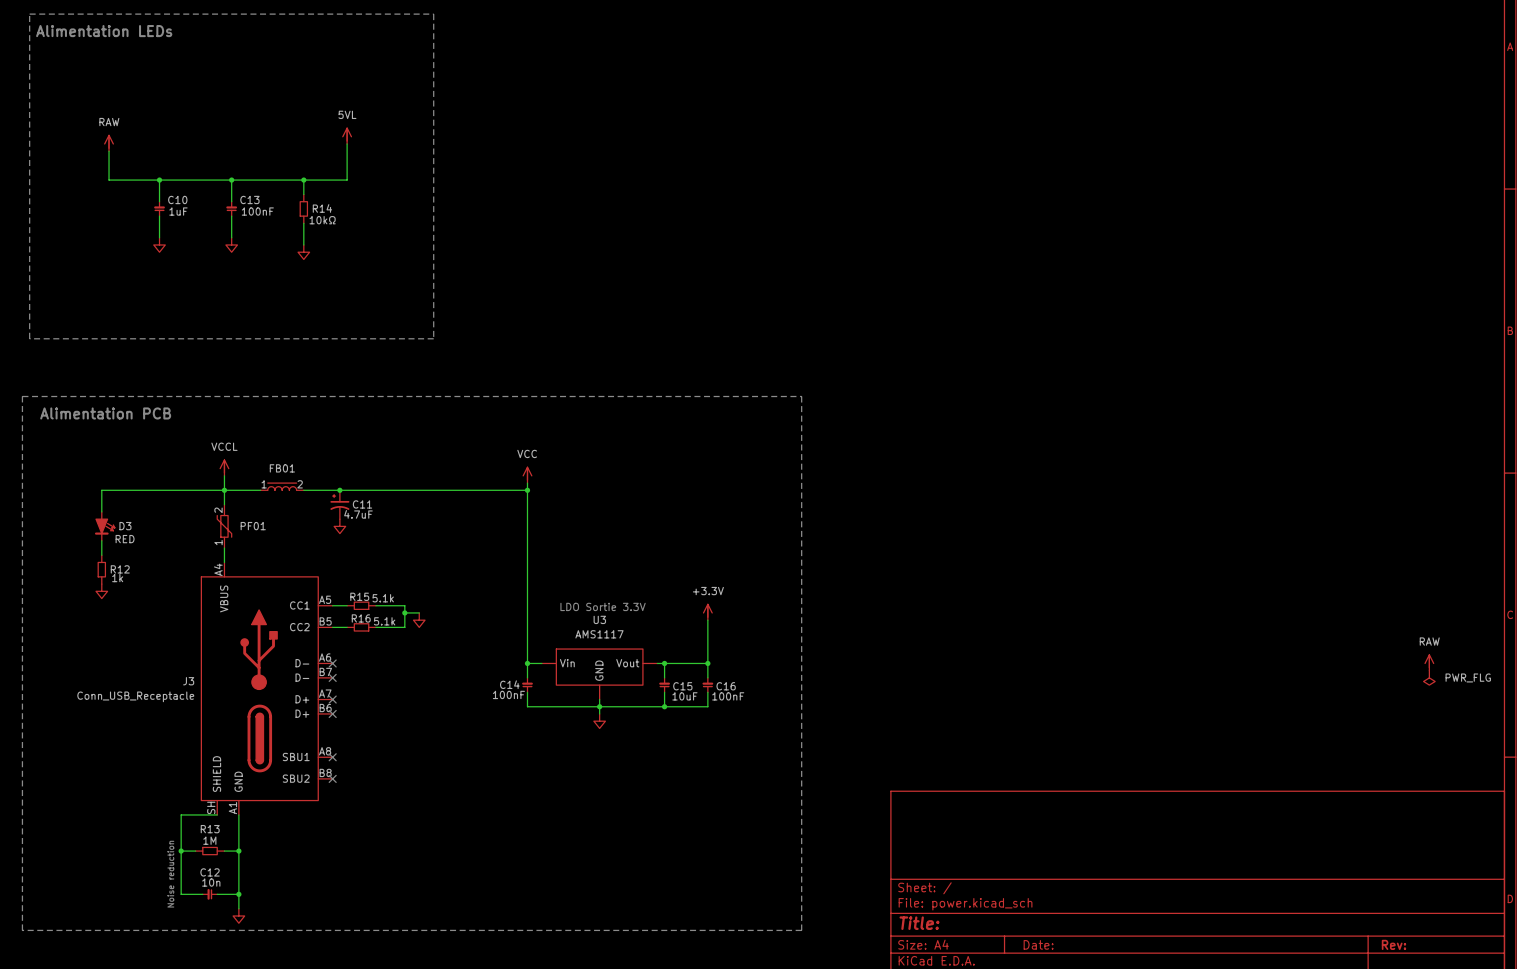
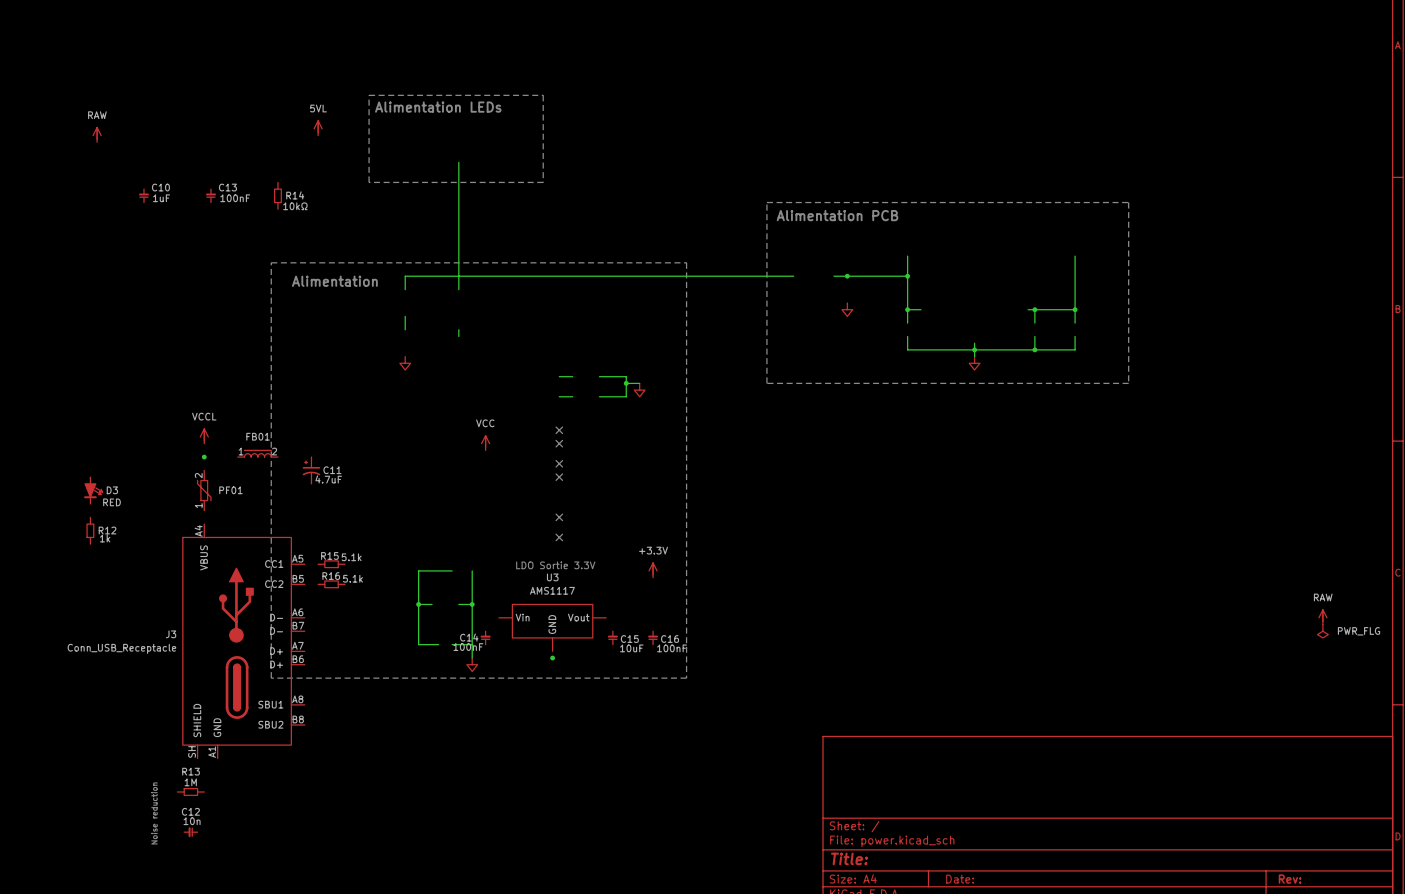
line: (29, 14) (433, 14) (433, 338) (29, 338) (29, 14) -> none
text: Alimentation LEDs (104, 31) -> none
line: none -> (369, 95) (543, 95) (543, 182) (369, 182) (369, 95)
text: none -> Alimentation LEDs (438, 107)
wire: (347, 143) (347, 180) (109, 180) (109, 151) -> none
wire: none -> (458, 162) (458, 289)
wire: (159, 180) (159, 201) -> none
junction: (159, 180) -> none
wire: (231, 180) (231, 201) -> none
junction: (231, 180) -> none
wire: (303, 180) (303, 194) -> none
junction: (303, 180) -> none
wire: (159, 216) (159, 237) -> none
wire: (231, 216) (231, 237) -> none
line: none -> (766, 202) (1128, 202) (1128, 383) (766, 383) (766, 202)
wire: (303, 223) (303, 244) -> none
text: none -> Alimentation PCB (837, 215)
power symbol: (159, 244) -> none
power symbol: (231, 244) -> none
power symbol: (303, 252) -> none
wire: none -> (907, 256) (907, 323)
wire: none -> (1075, 256) (1075, 323)
line: none -> (271, 262) (686, 262) (686, 678) (271, 678) (271, 262)
wire: none -> (793, 276) (405, 276) (405, 289)
wire: none -> (833, 276) (907, 276)
junction: none -> (847, 276)
junction: none -> (907, 276)
text: none -> Alimentation (334, 281)
power symbol: none -> (847, 309)
wire: none -> (907, 309) (921, 309)
junction: none -> (907, 309)
wire: none -> (1028, 309) (1075, 309)
wire: none -> (1034, 309) (1034, 323)
junction: none -> (1034, 309)
junction: none -> (1075, 309)
wire: none -> (405, 316) (405, 329)
wire: none -> (458, 329) (458, 336)
wire: none -> (907, 336) (907, 349) (1075, 349) (1075, 336)
wire: none -> (1034, 336) (1034, 349)
wire: none -> (974, 343) (974, 356)
junction: none -> (974, 349)
junction: none -> (1034, 349)
power symbol: none -> (405, 363)
power symbol: none -> (974, 363)
line: (22, 396) (801, 396) (801, 930) (22, 930) (22, 396) -> none
wire: none -> (559, 376) (572, 376)
wire: none -> (599, 376) (626, 376) (626, 396) (599, 396)
wire: none -> (626, 383) (639, 383)
junction: none -> (626, 383)
text: Alimentation PCB (105, 413) -> none
power symbol: none -> (639, 390)
wire: none -> (559, 396) (572, 396)
no-connect mark: none -> (559, 430)
wire: (224, 475) (224, 504) -> none
no-connect mark: none -> (559, 443)
wire: (527, 483) (527, 677) -> none
wire: (260, 490) (101, 490) (101, 511) -> none
wire: (303, 490) (527, 490) -> none
junction: (339, 490) -> none
junction: (527, 490) -> none
no-connect mark: none -> (559, 463)
no-connect mark: none -> (559, 477)
power symbol: (339, 526) -> none
wire: (101, 540) (101, 555) -> none
wire: (224, 548) (224, 562) -> none
no-connect mark: none -> (559, 517)
no-connect mark: none -> (559, 537)
power symbol: (101, 591) -> none
wire: (332, 605) (347, 605) -> none
wire: (375, 605) (404, 605) (404, 627) (375, 627) -> none
wire: (404, 612) (419, 612) -> (418, 604) (432, 604)
junction: (404, 612) -> none
wire: none -> (452, 570) (418, 570) (418, 644) (438, 644)
wire: none -> (472, 570) (472, 658)
power symbol: (419, 620) -> none
wire: (707, 620) (707, 677) -> none
wire: (332, 627) (347, 627) -> none
junction: none -> (418, 604)
no-connect mark: (332, 663) -> none
wire: (527, 663) (541, 663) -> (458, 604) (472, 604)
junction position: (527, 663) -> (472, 604)
wire: (657, 663) (707, 663) -> none
wire: (664, 663) (664, 677) -> none
junction: (664, 663) -> none
junction: (707, 663) -> none
no-connect mark: (332, 677) -> none
wire: none -> (452, 644) (472, 644)
wire: (527, 692) (527, 706) (707, 706) (707, 692) -> none
wire: (664, 692) (664, 706) -> none
no-connect mark: (332, 699) -> none
wire: (599, 699) (599, 713) -> none
junction: (664, 706) -> none
no-connect mark: (332, 713) -> none
power symbol: none -> (472, 664)
power symbol: (599, 721) -> none
no-connect mark: (332, 757) -> none
no-connect mark: (332, 778) -> none
wire: (217, 814) (181, 814) (181, 894) (202, 894) -> none
wire: (238, 814) (238, 908) -> none
wire: (181, 851) (195, 851) -> none
junction: (181, 851) -> none
wire: (224, 851) (238, 851) -> none
junction: (238, 851) -> none
wire: (217, 894) (238, 894) -> none
junction: (238, 894) -> none
power symbol: (238, 915) -> none

